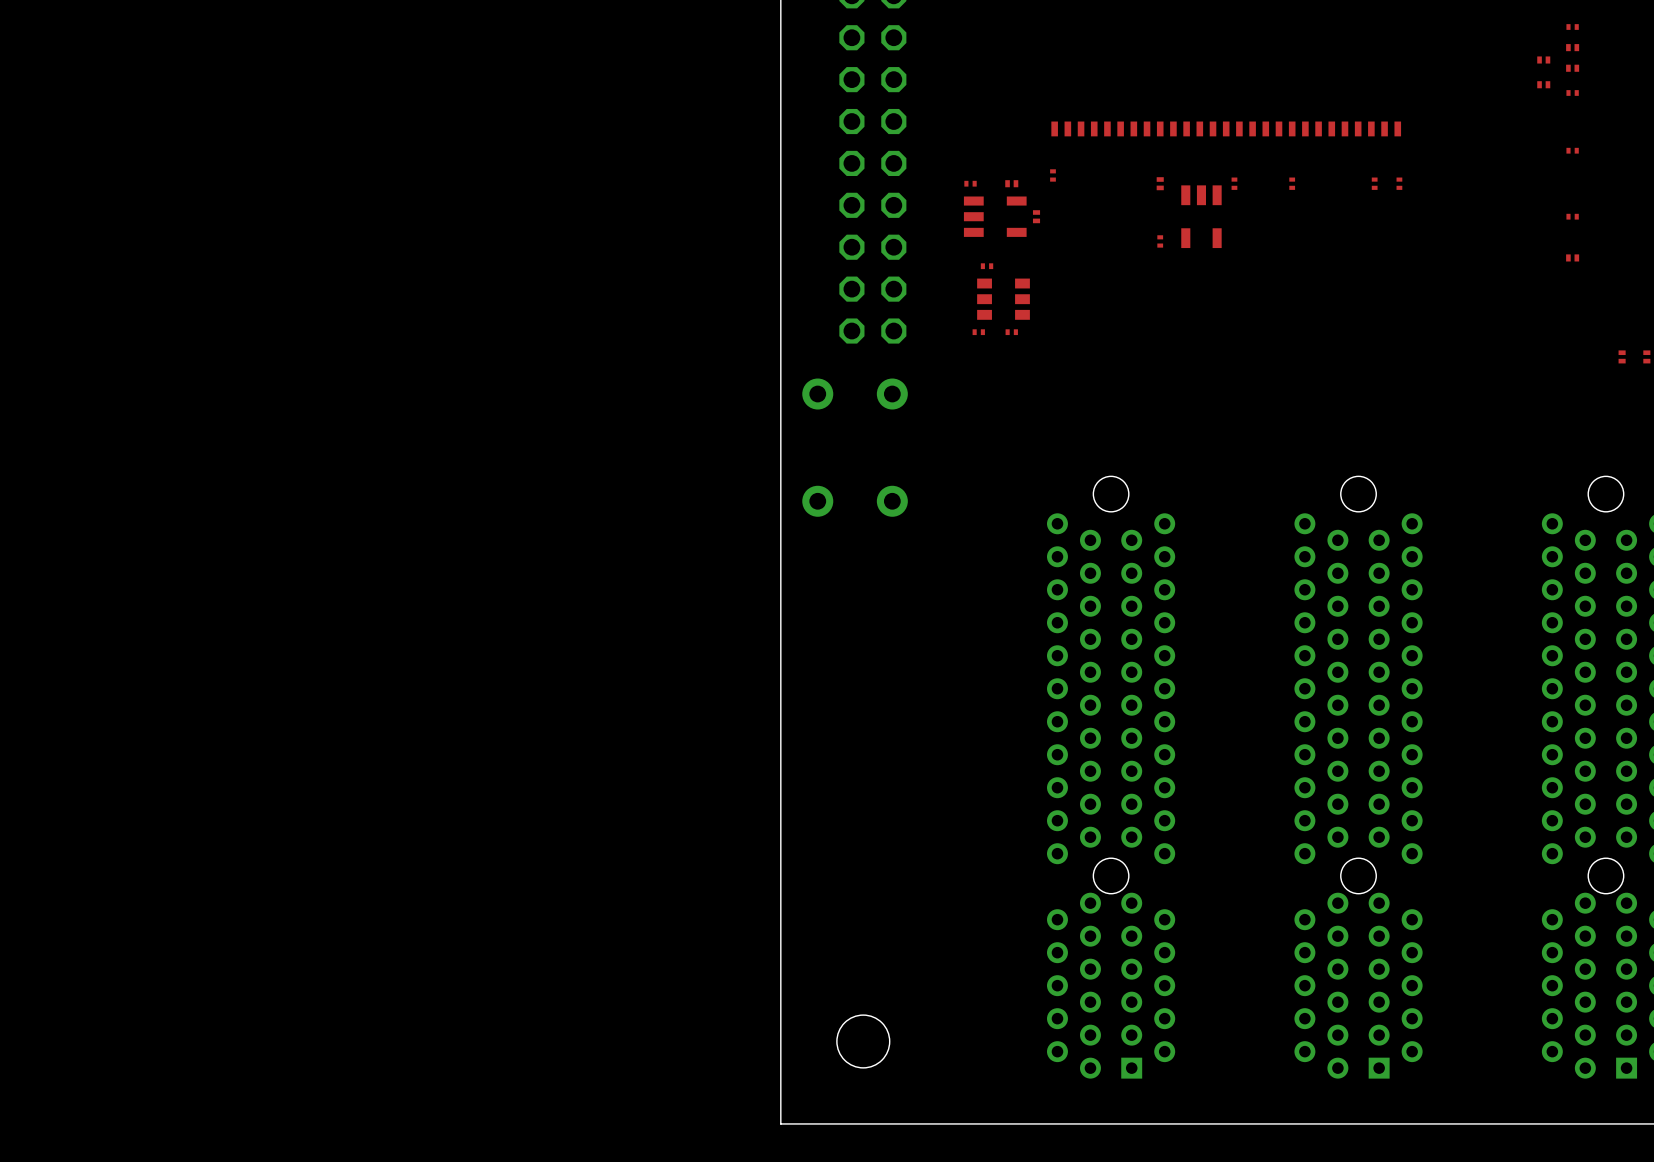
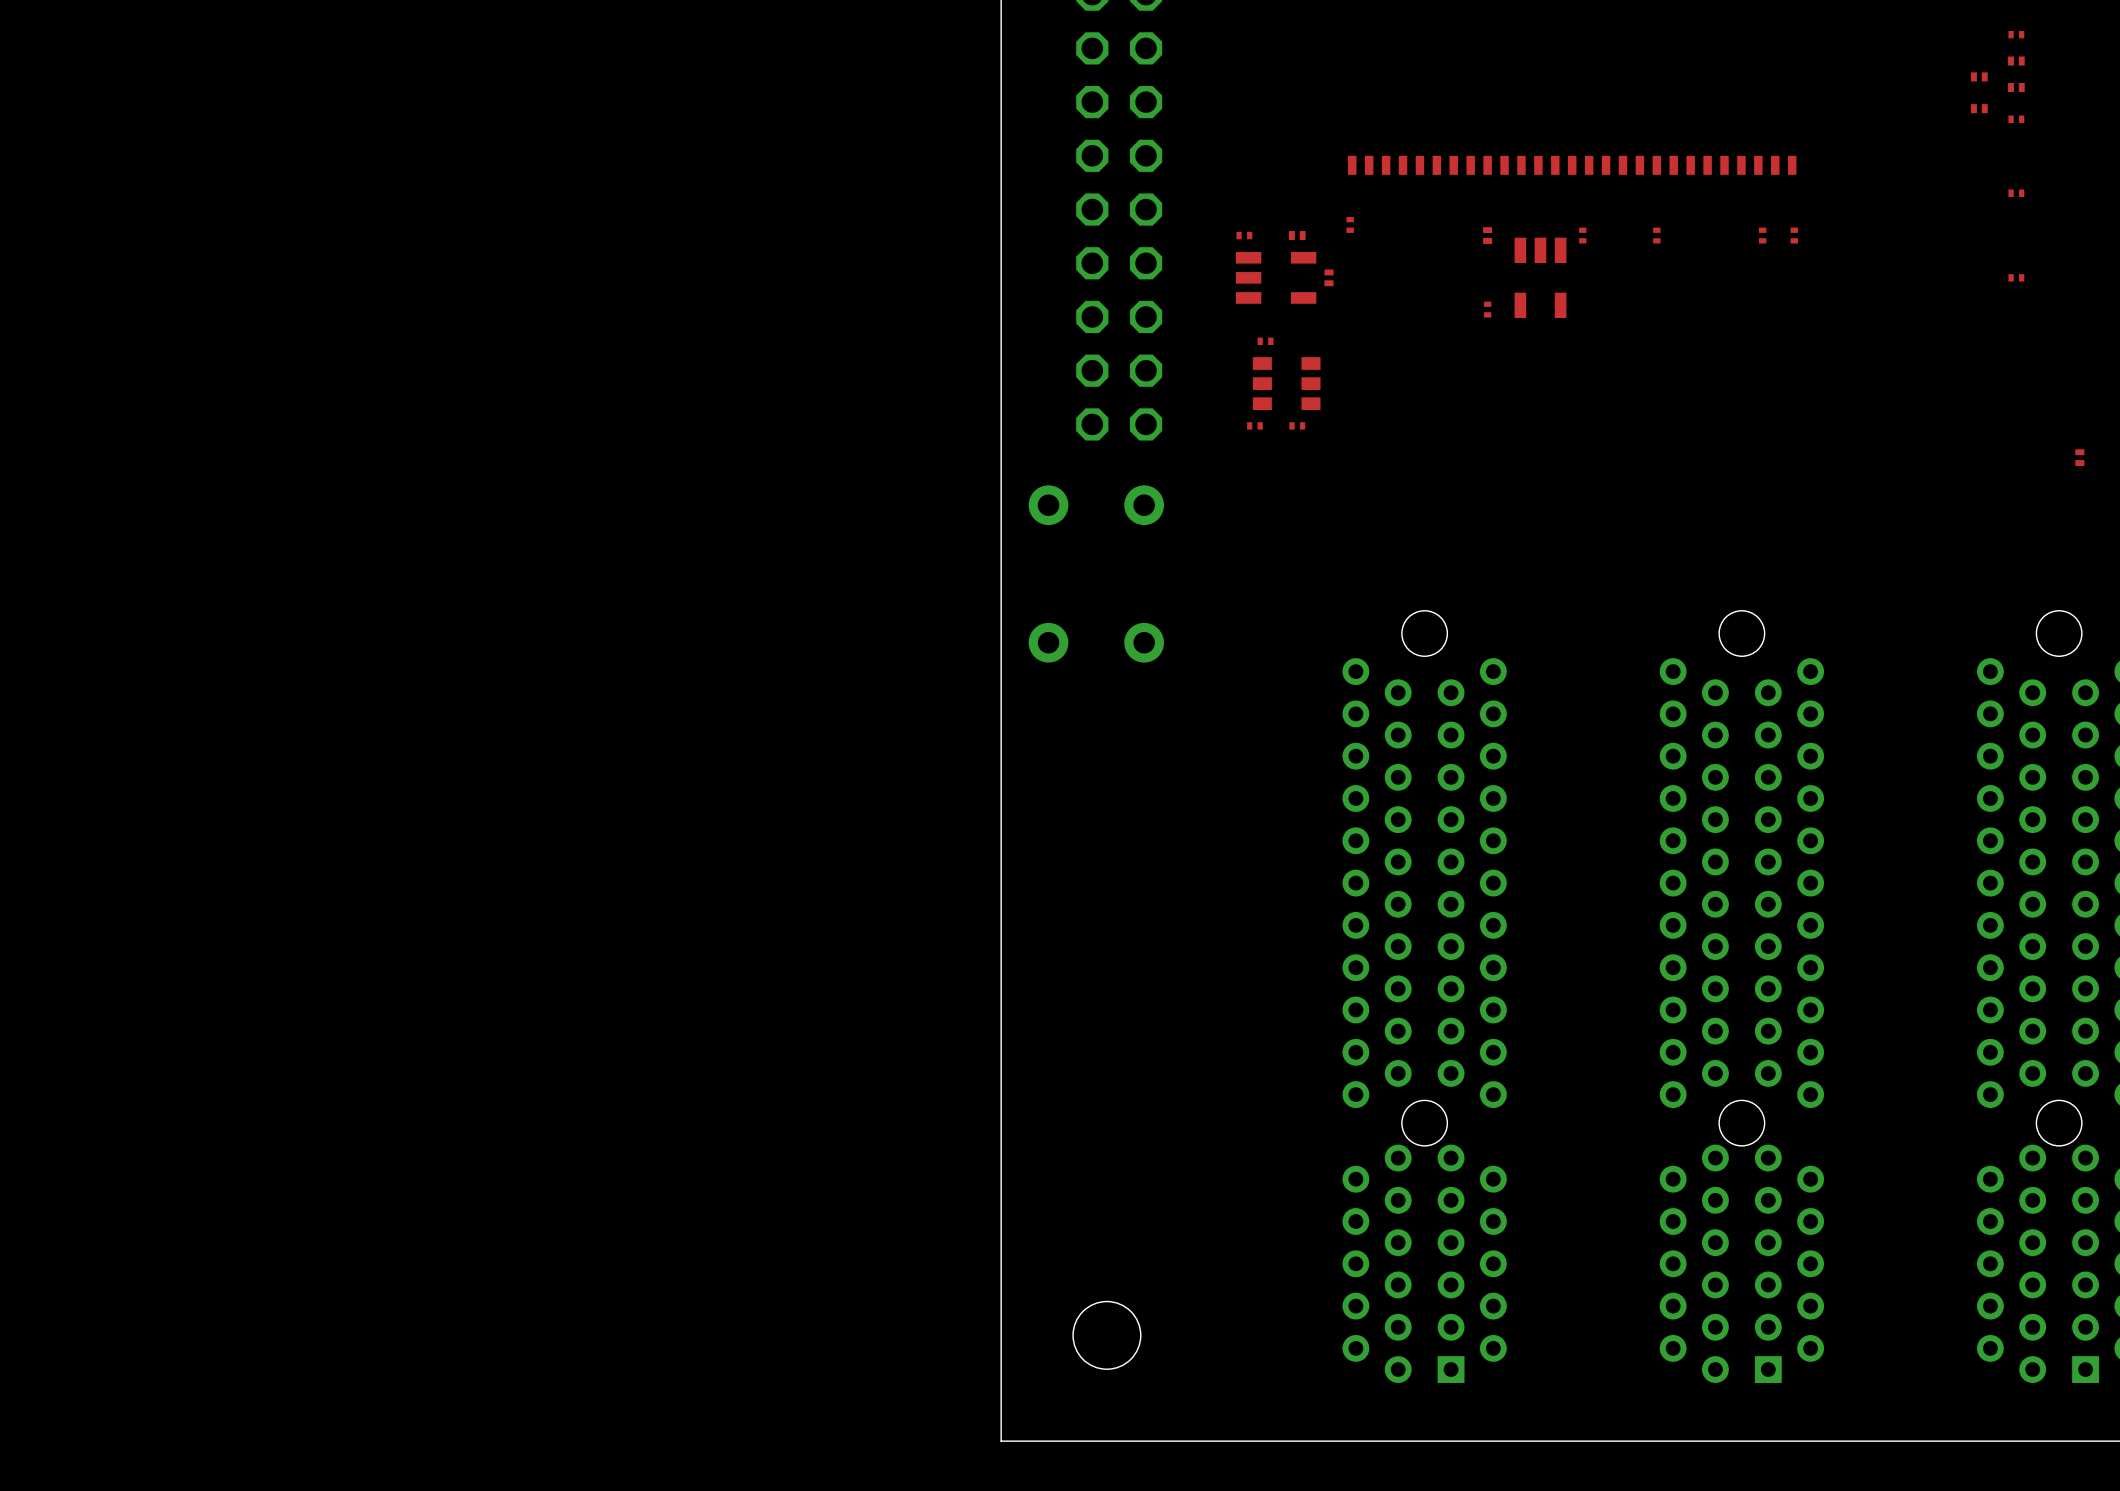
part: (1572, 257) -> none
part: (1646, 356) -> none

